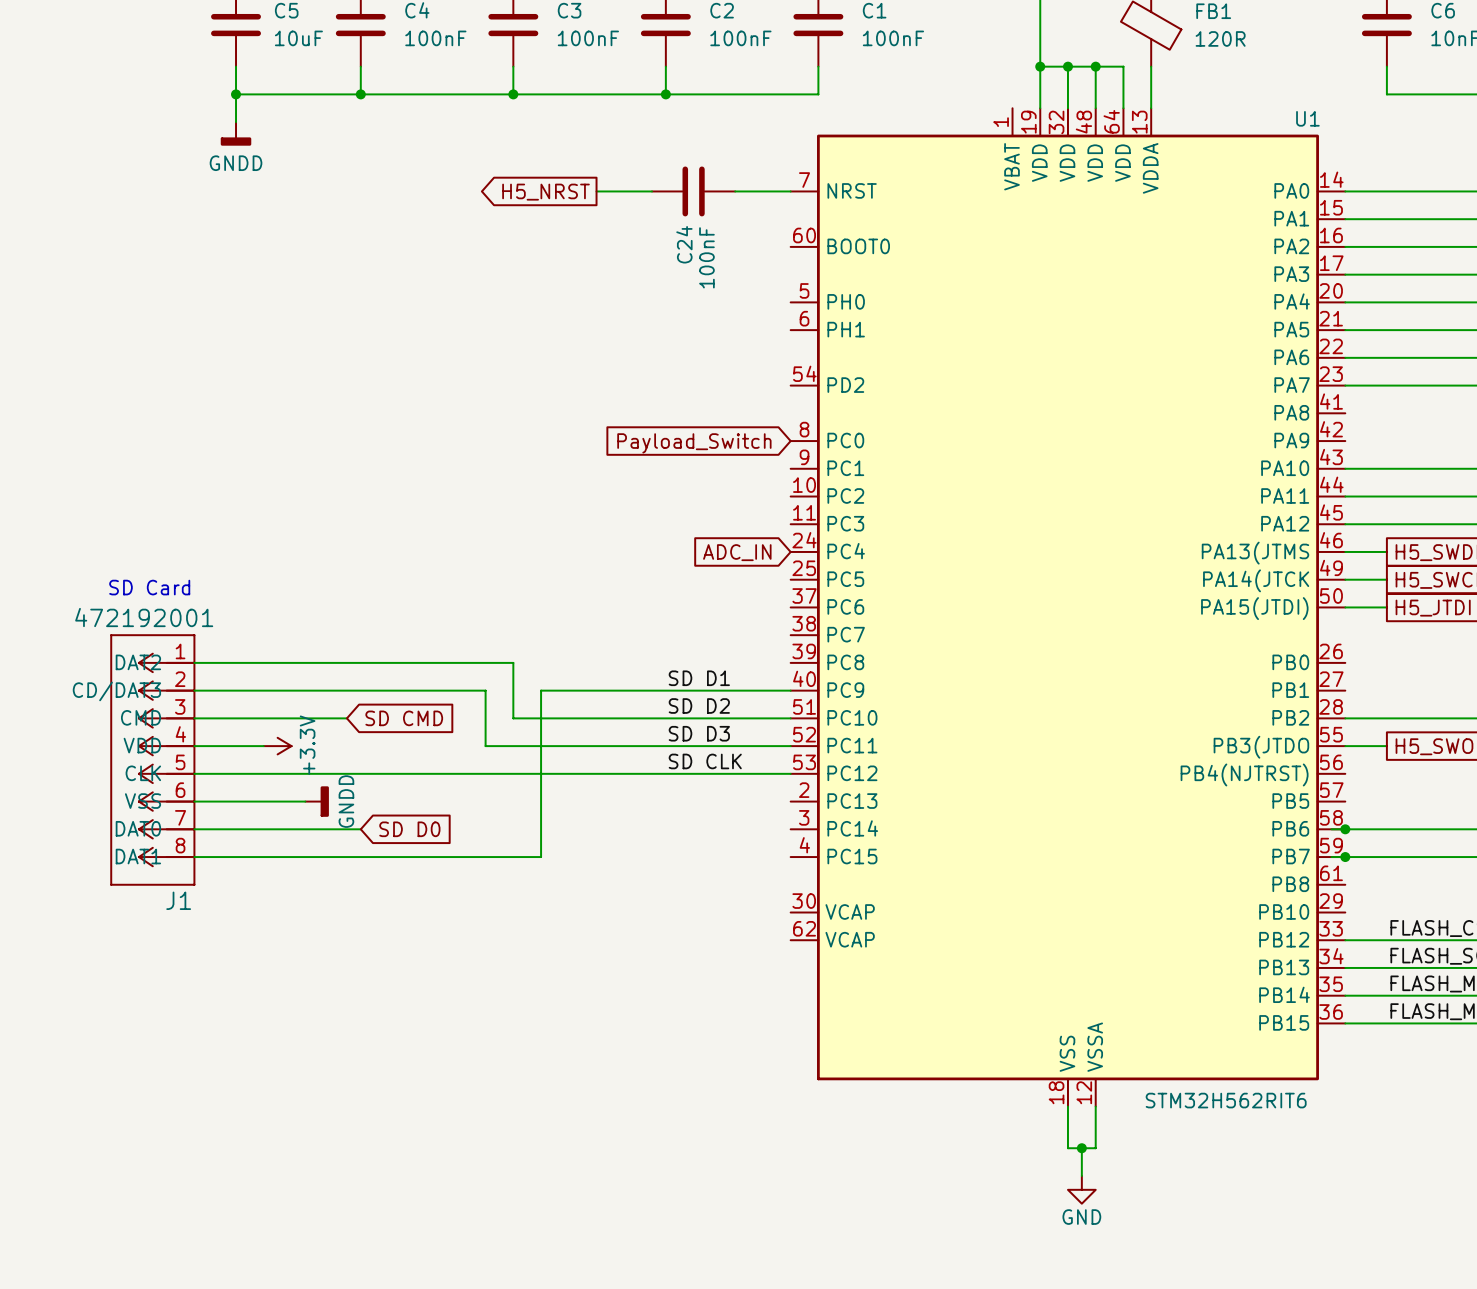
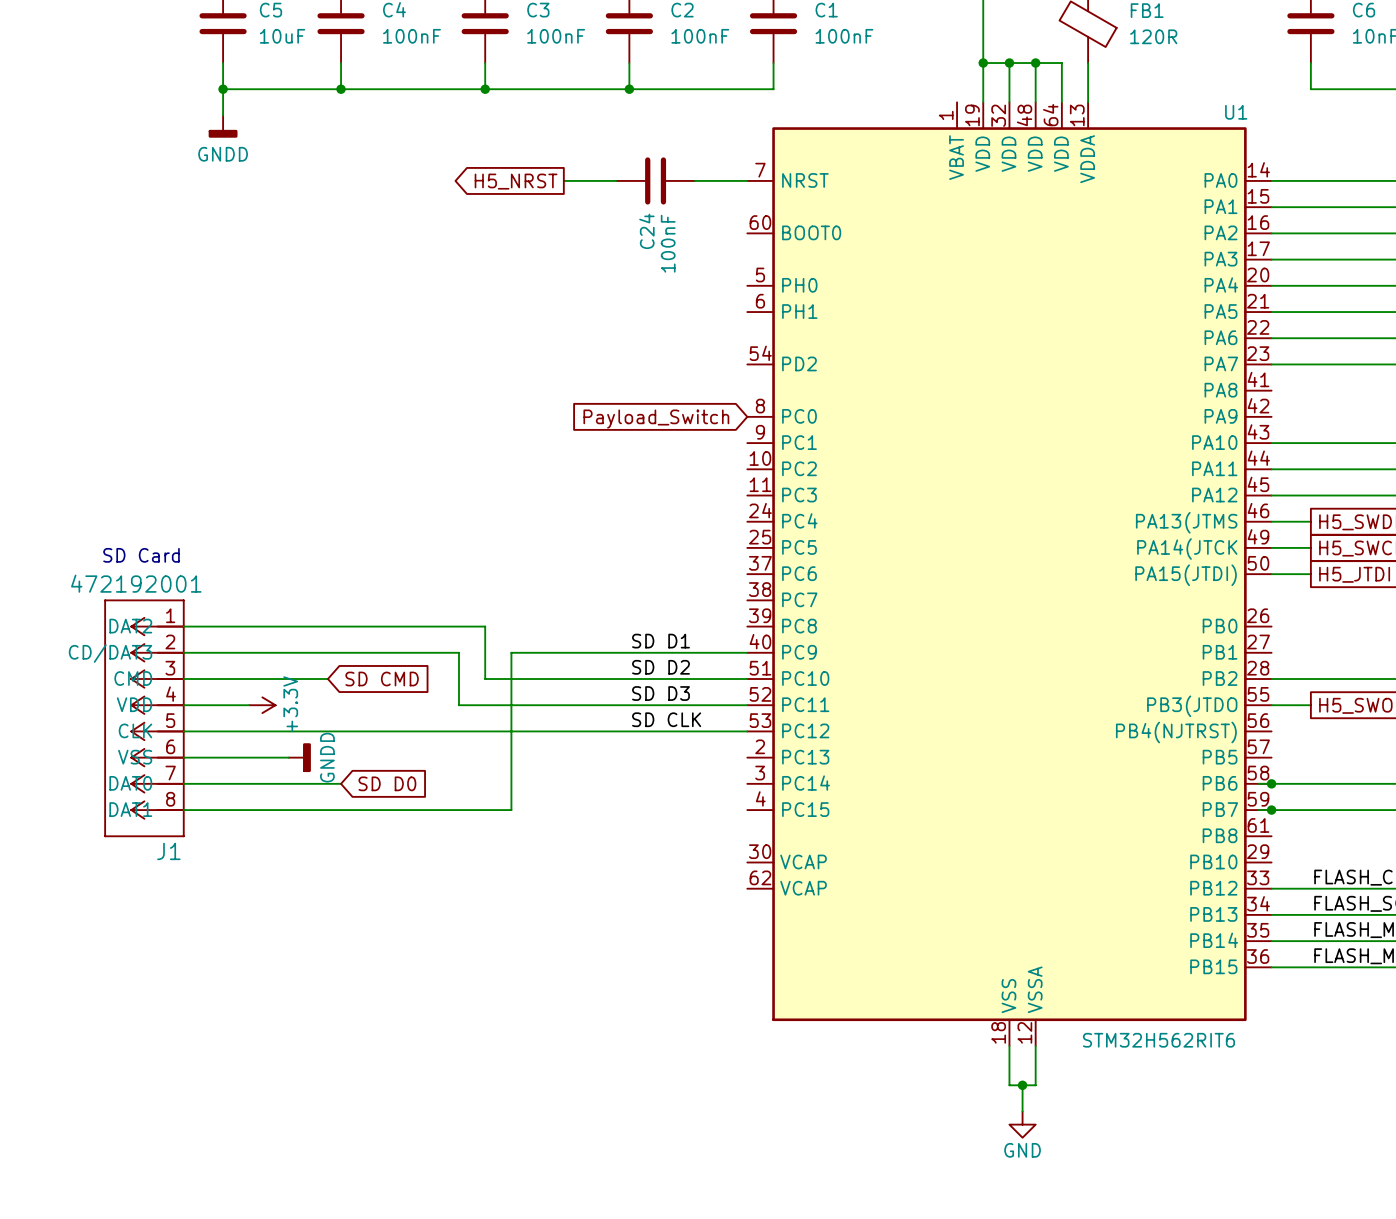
global label: ADC_IN (737, 552) -> none

